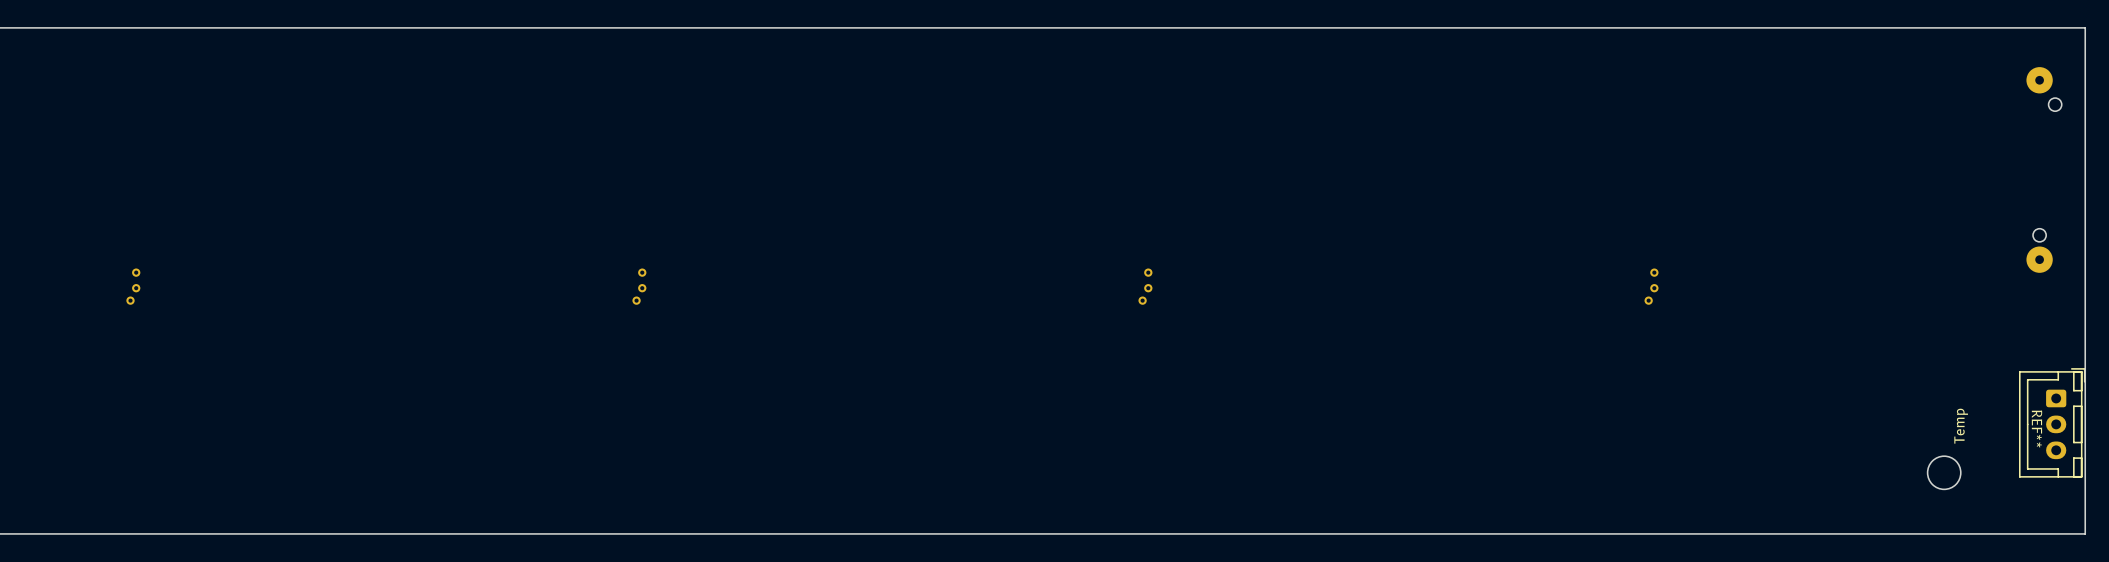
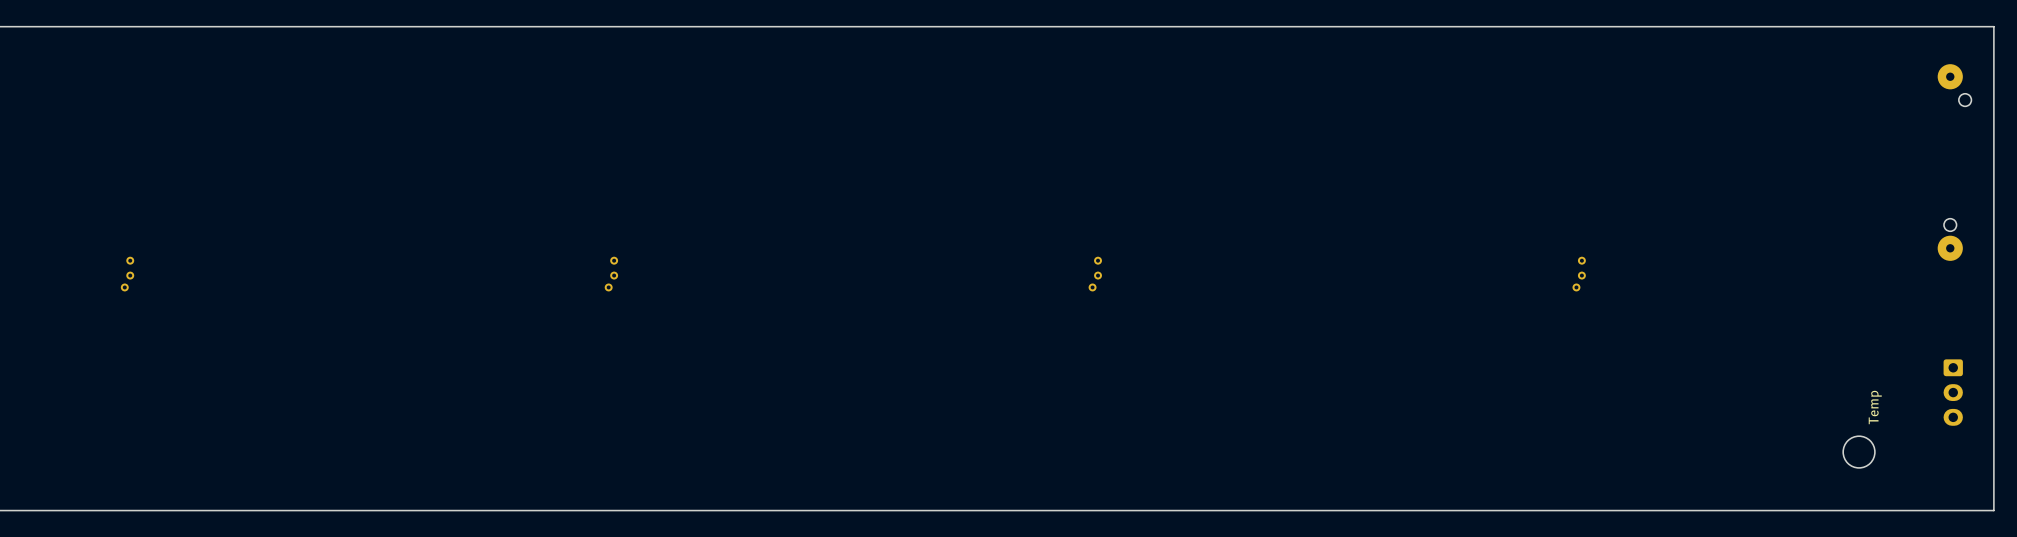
REF** side: bottom (2052, 422) -> top (1953, 392)

